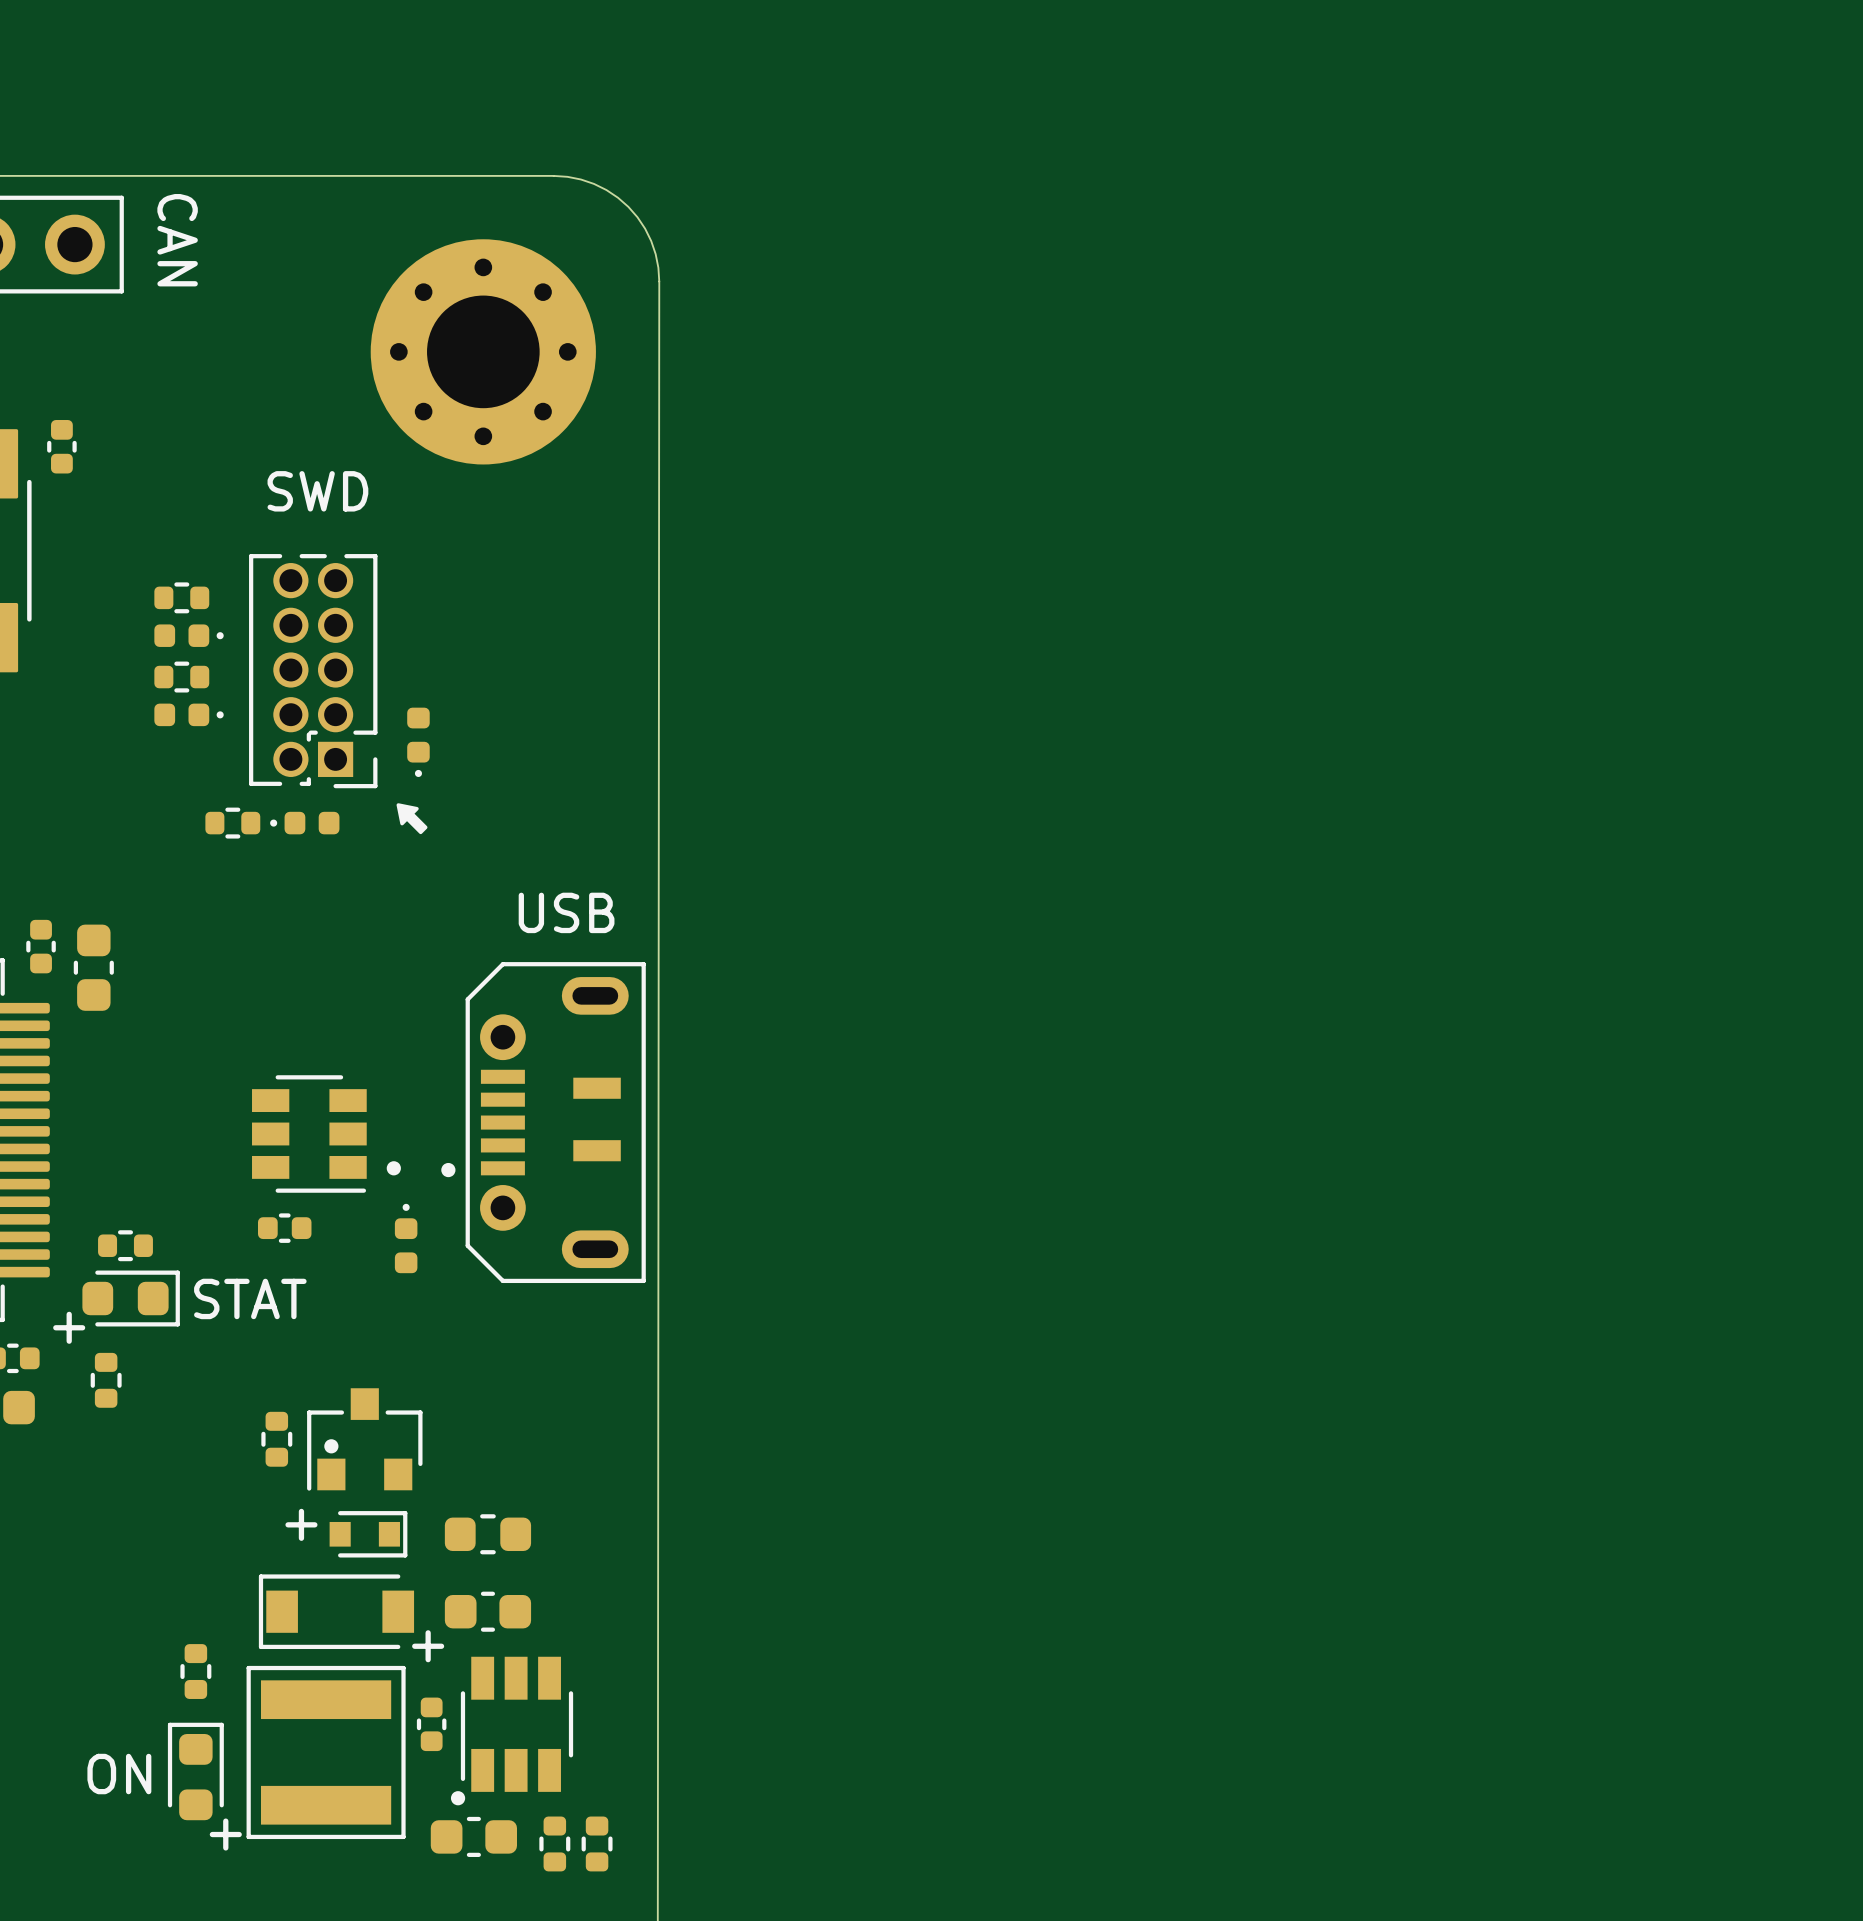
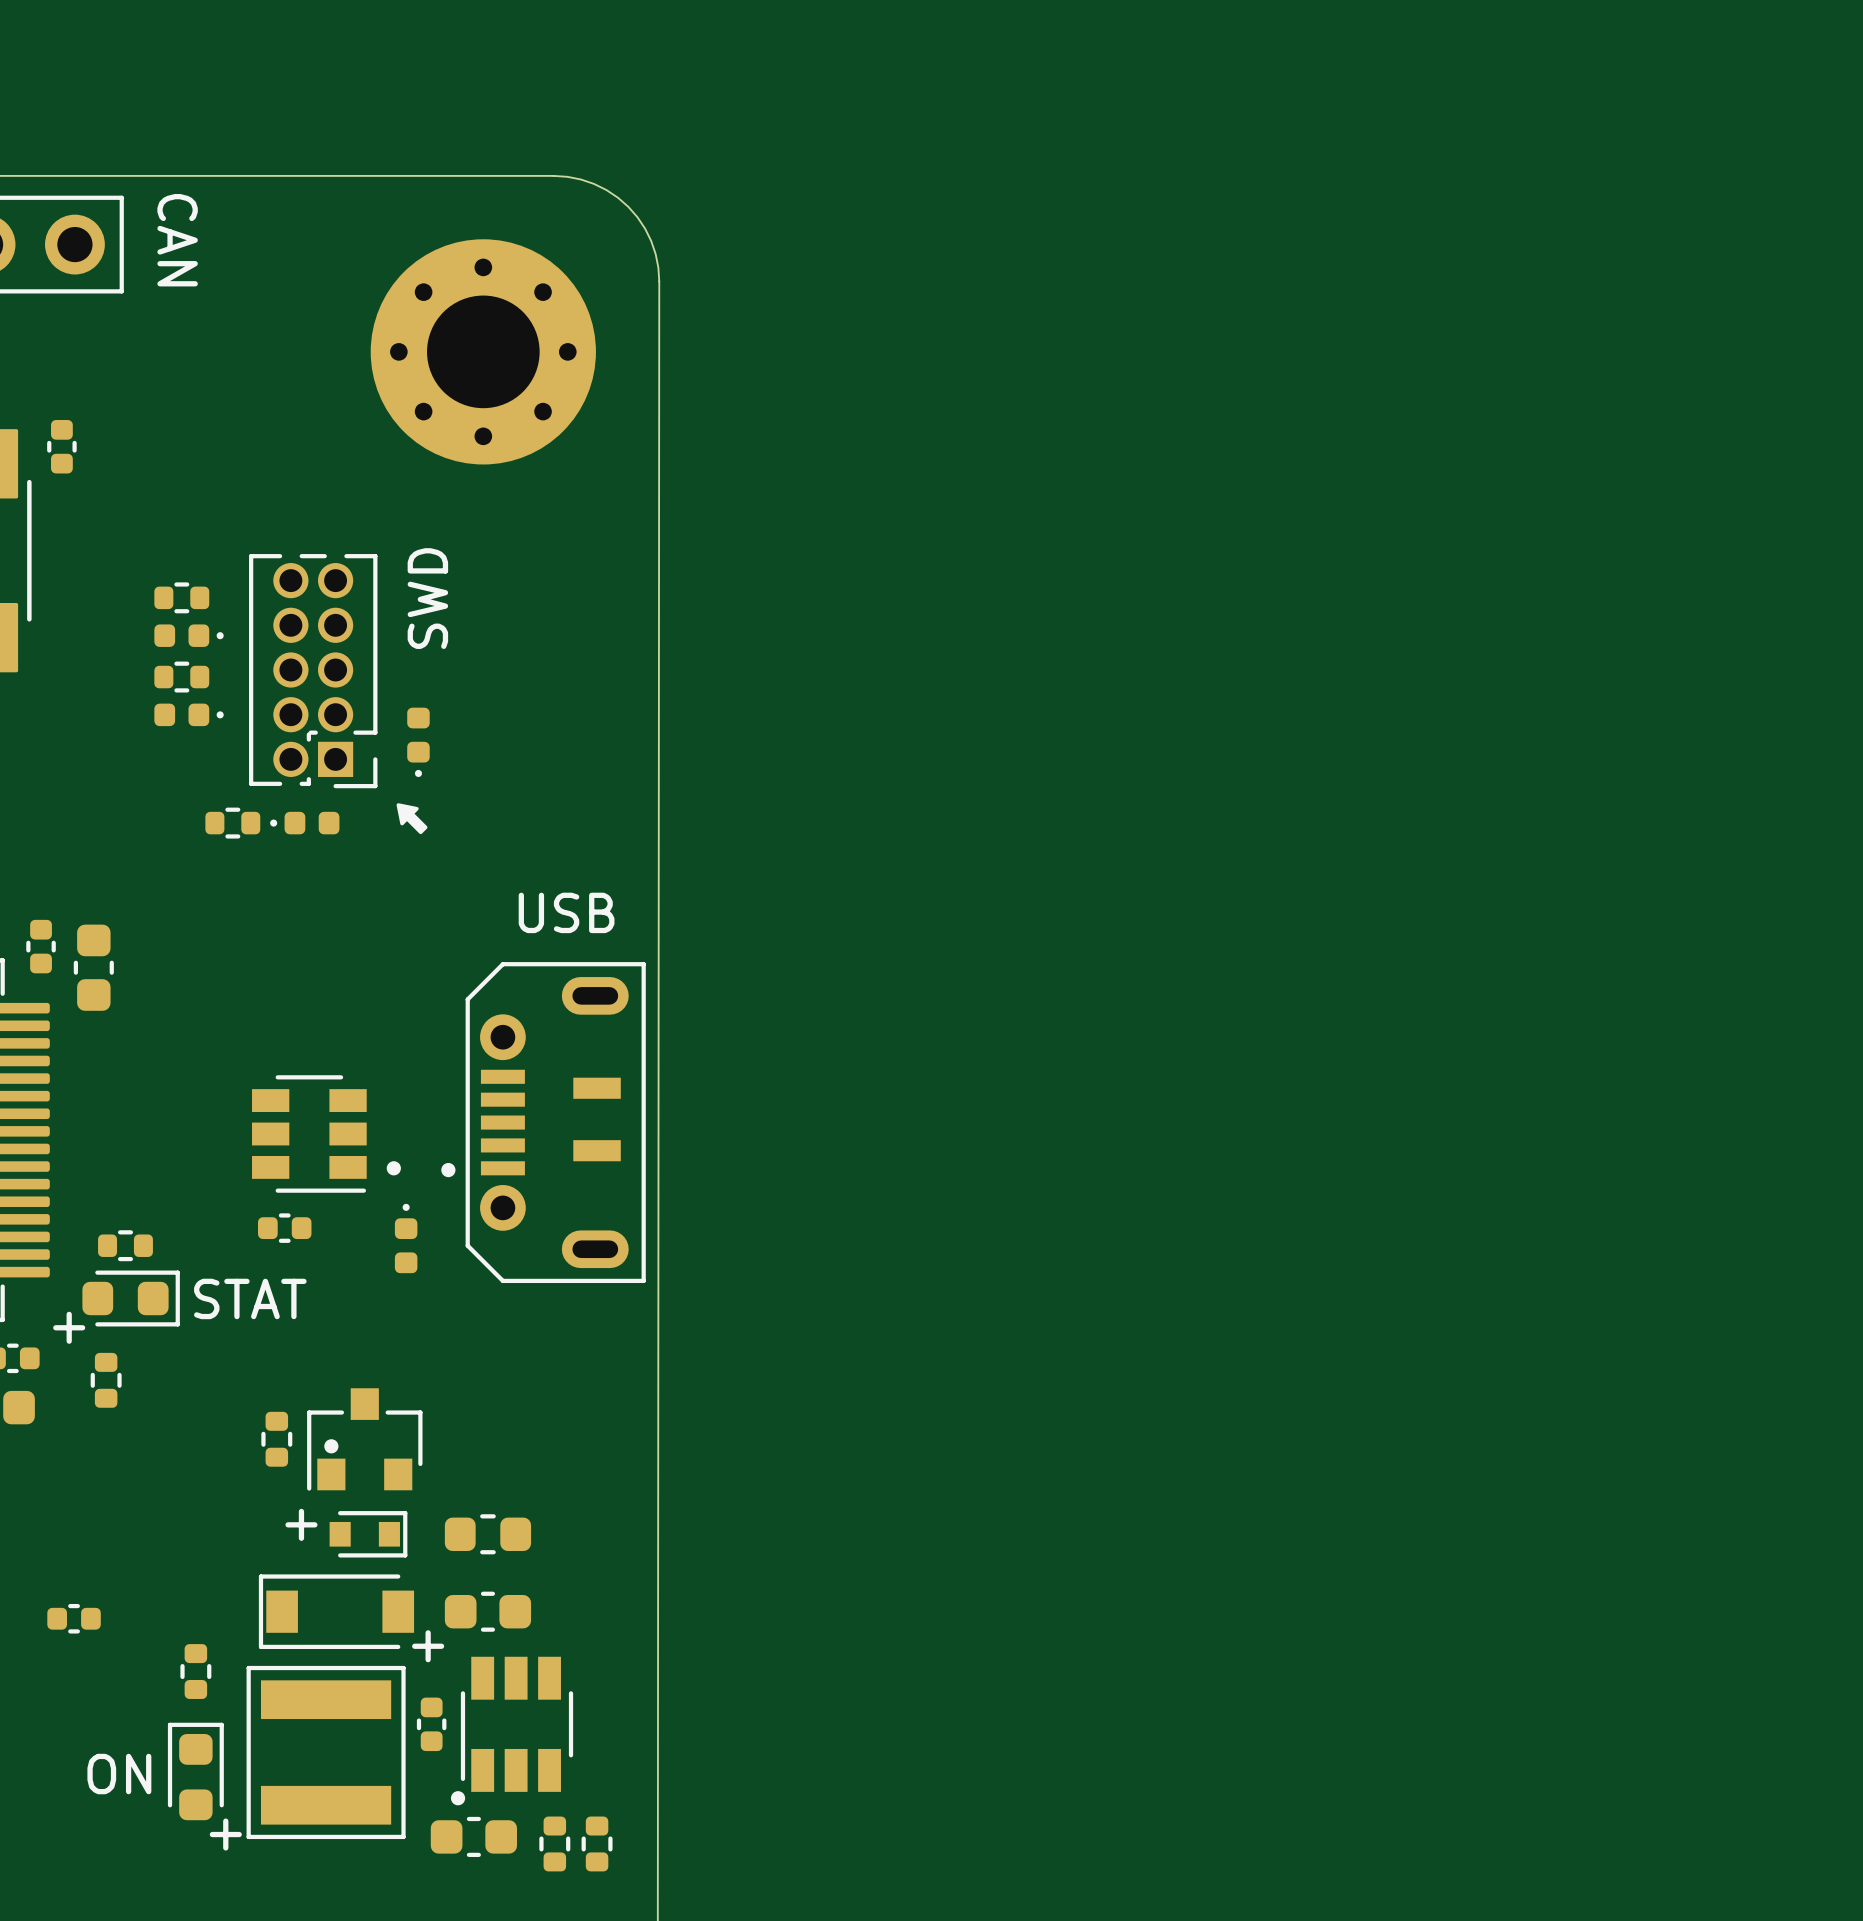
text rotation: 0° (317, 491) -> 90° counterclockwise (427, 598)
text position: SWD (317, 491) -> SWD (427, 598)
part: none -> (74, 1618)

